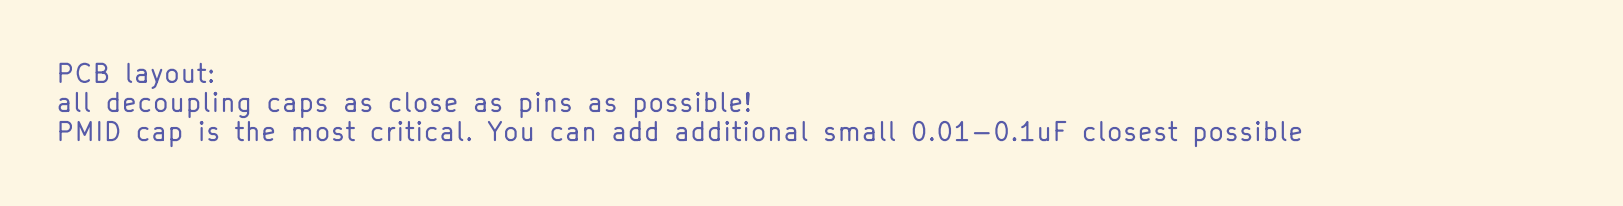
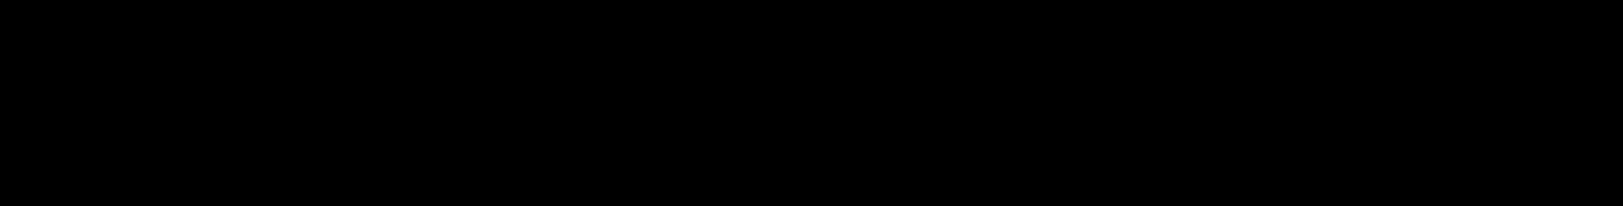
text: PCB layout: (136, 75) -> none
text: all decoupling caps as close as pins as possible! (404, 104) -> none
text: PMID cap is the most critical. You can add additional small 0.01-0.1uF closest possible (680, 134) -> none

